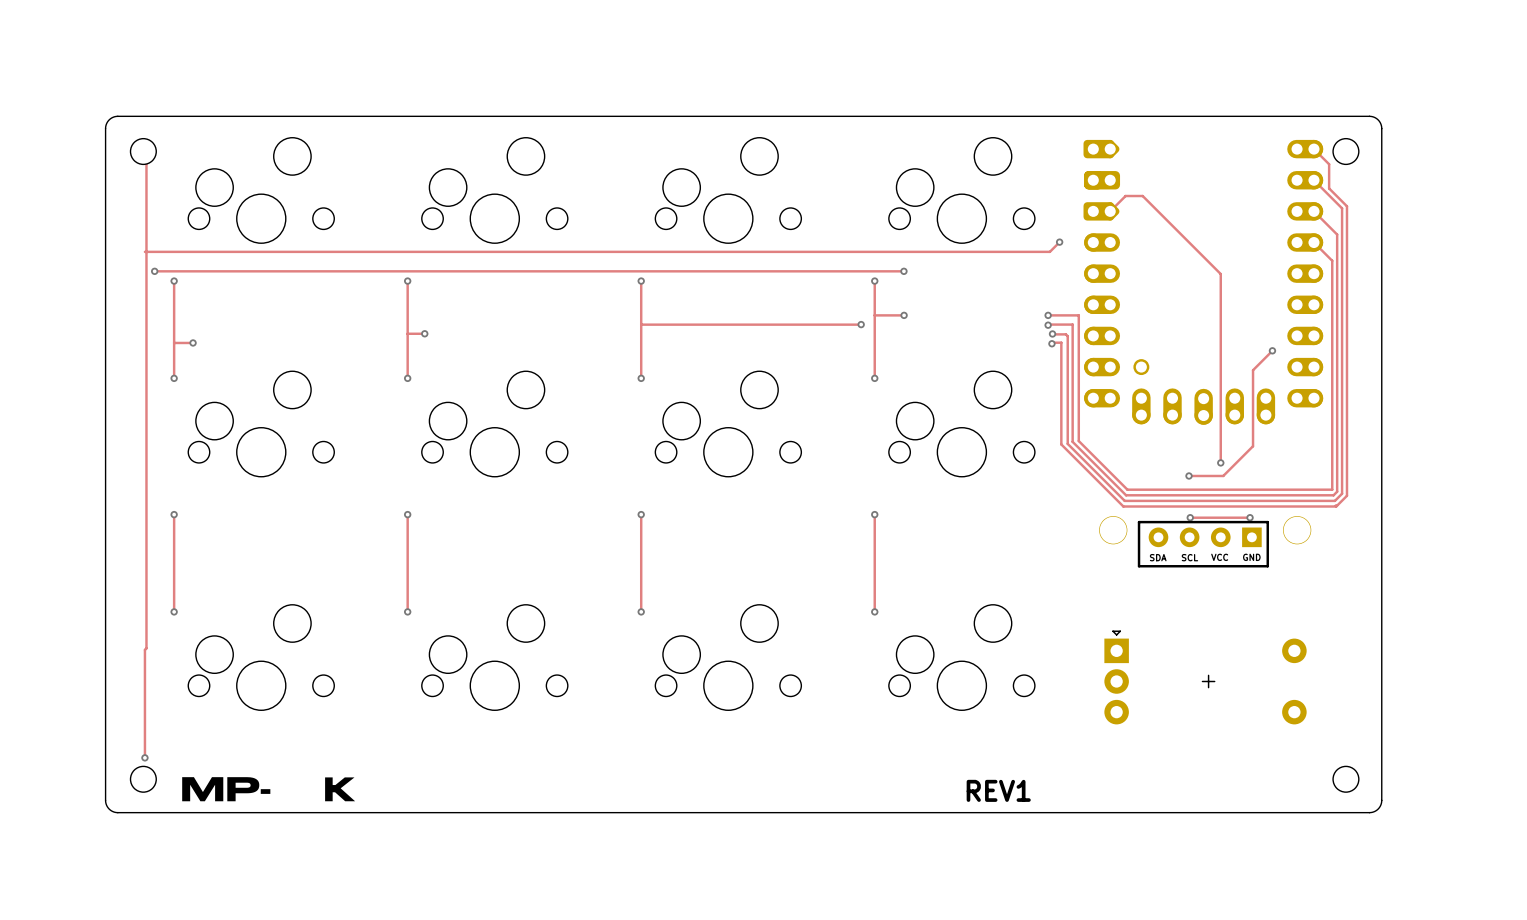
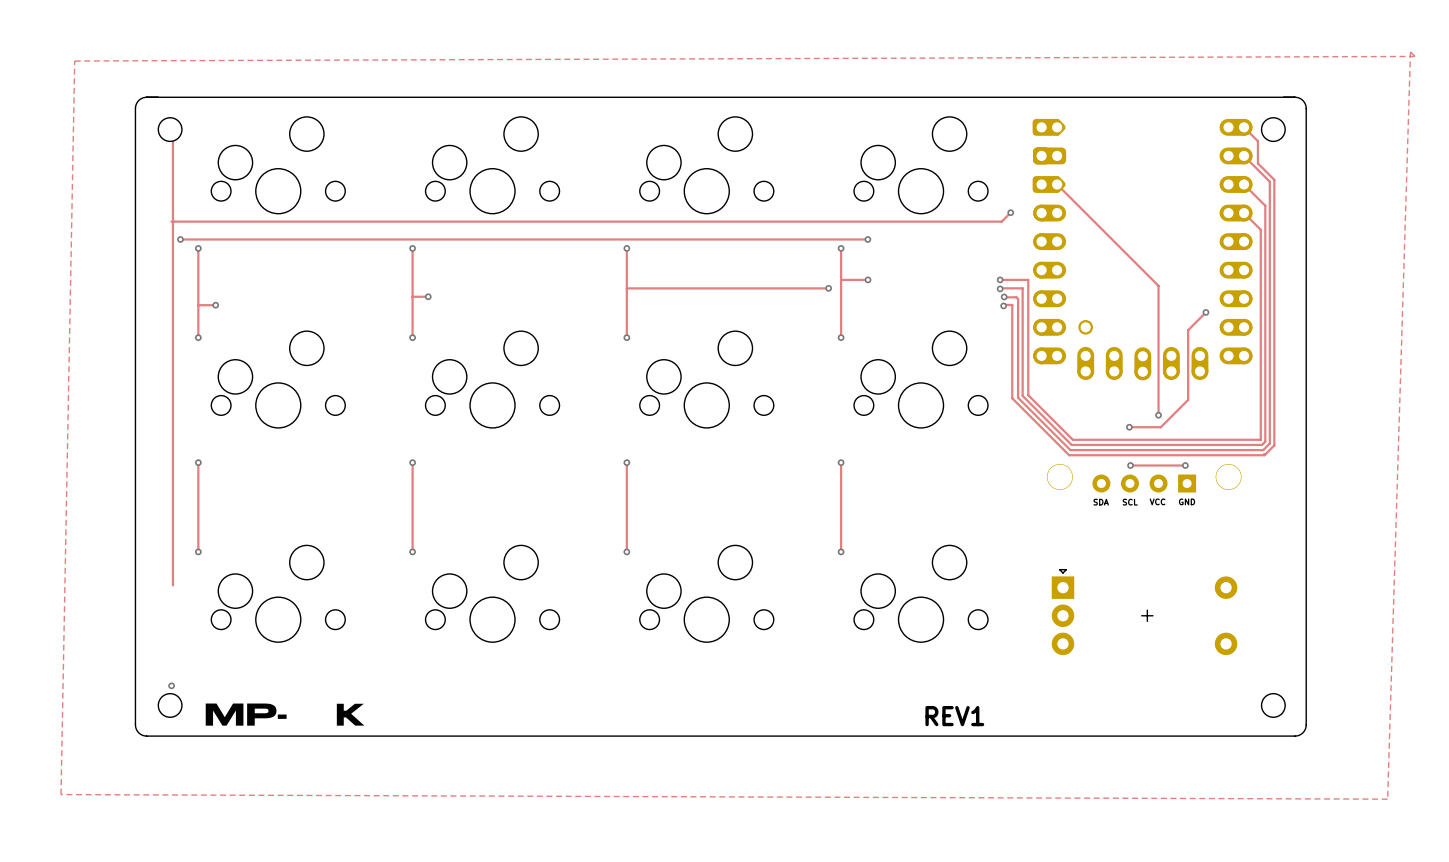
zone outline: none -> (1410, 51) (1387, 799) (61, 794) (74, 61) (1415, 56) (1410, 51)
track: (1110, 211) (1125, 196) (1142, 196) (1220, 274) (1220, 321) -> (1057, 184) (1158, 285)
line: (1139, 522) (1267, 522) (1267, 566) (1139, 566) (1139, 522) -> none
track: (146, 648) (144, 649) (144, 757) -> none

